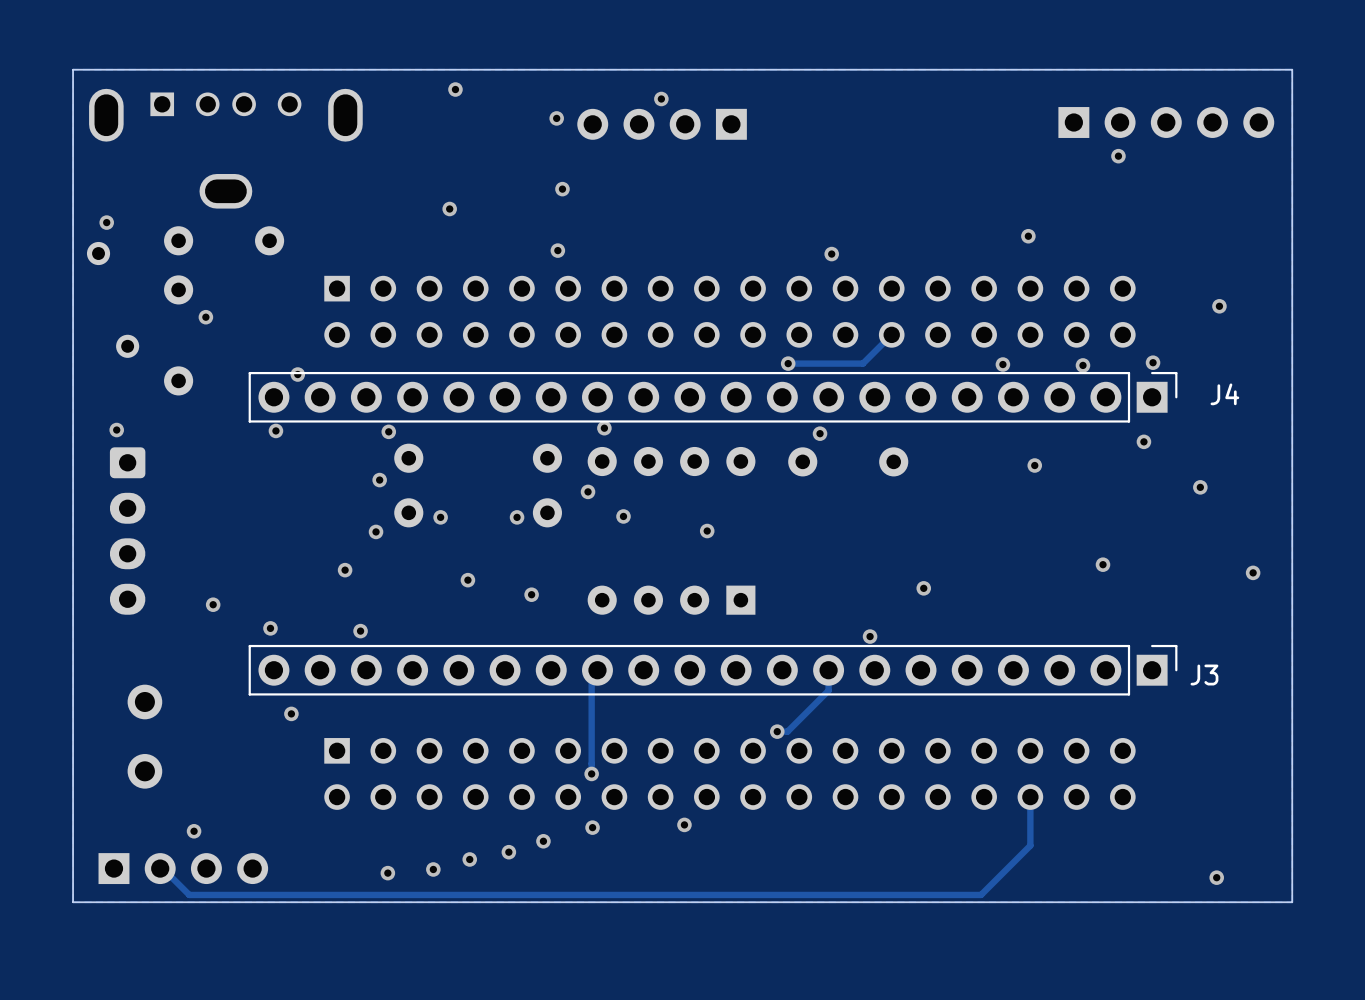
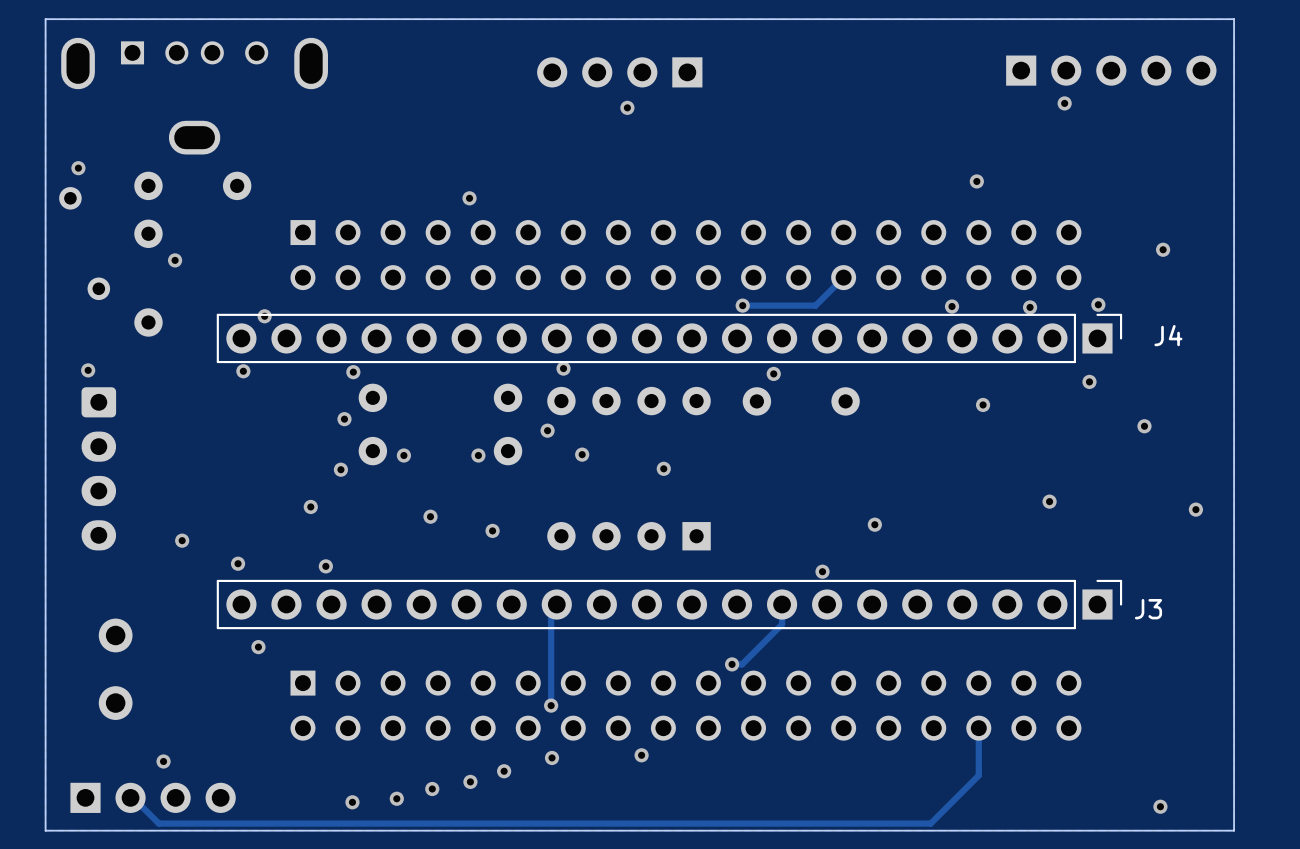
via: (455, 89) -> none
via: (661, 99) -> none
via: (556, 118) -> none
via: none -> (627, 107)
via: (562, 189) -> none
via: (449, 209) -> none
via: (557, 250) -> none
via: none -> (469, 198)
via: (831, 254) -> none

